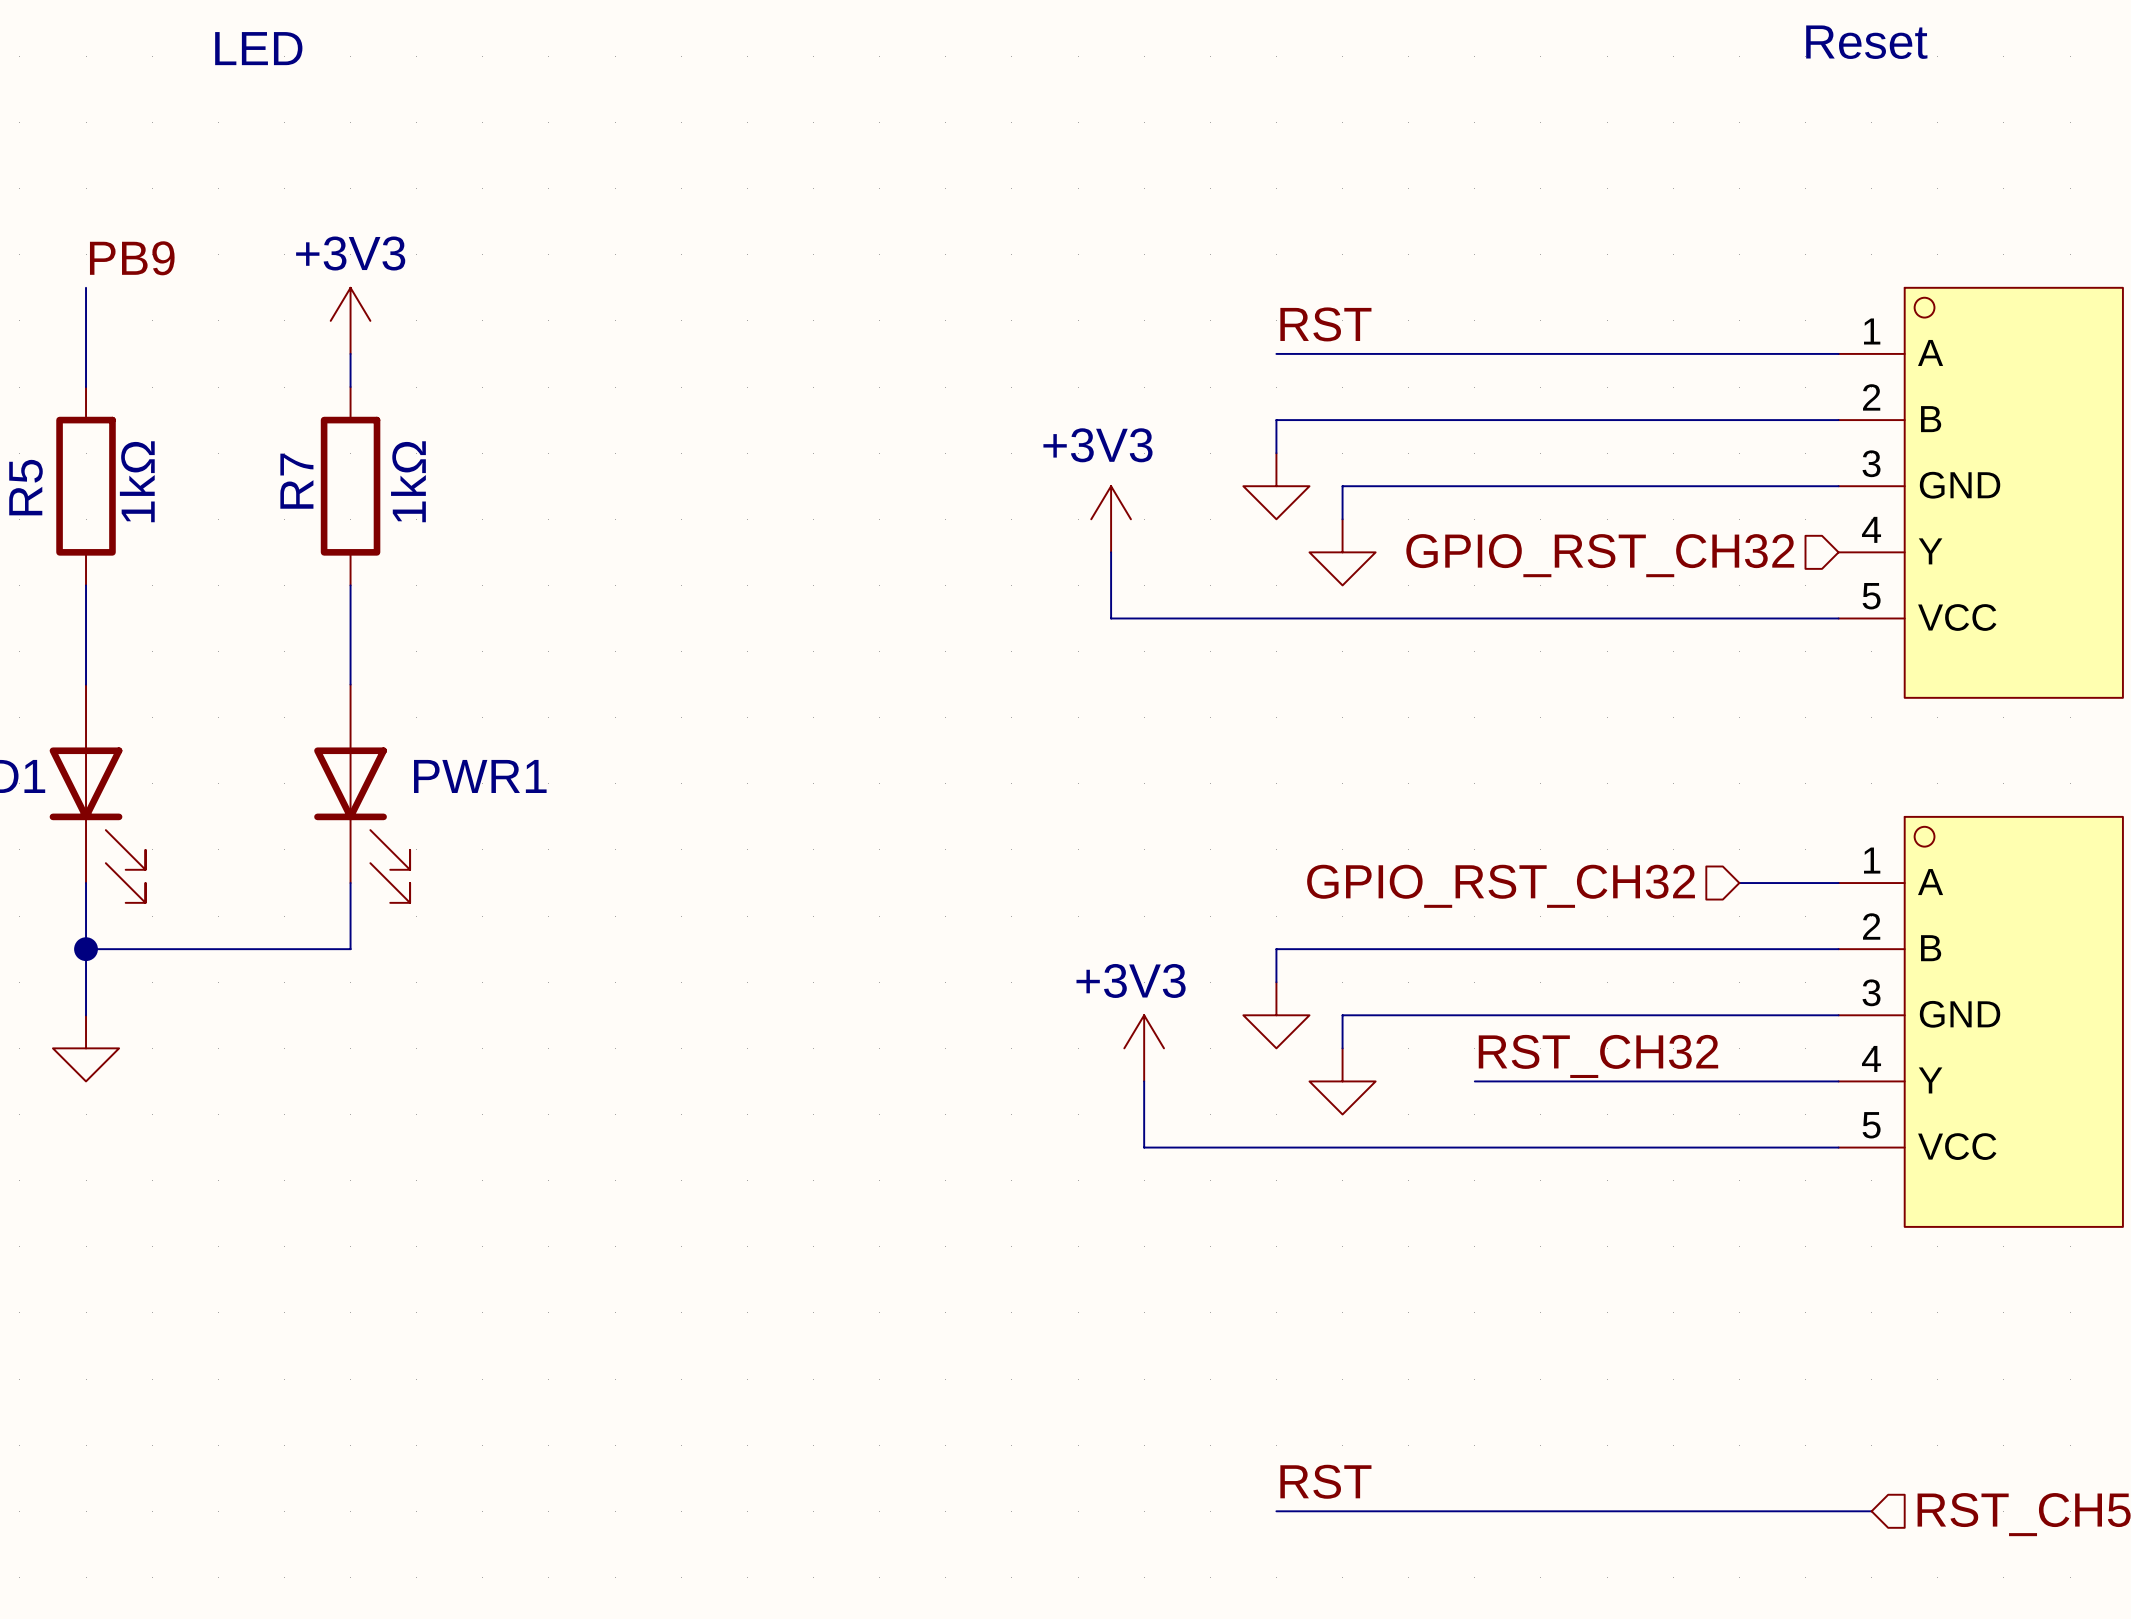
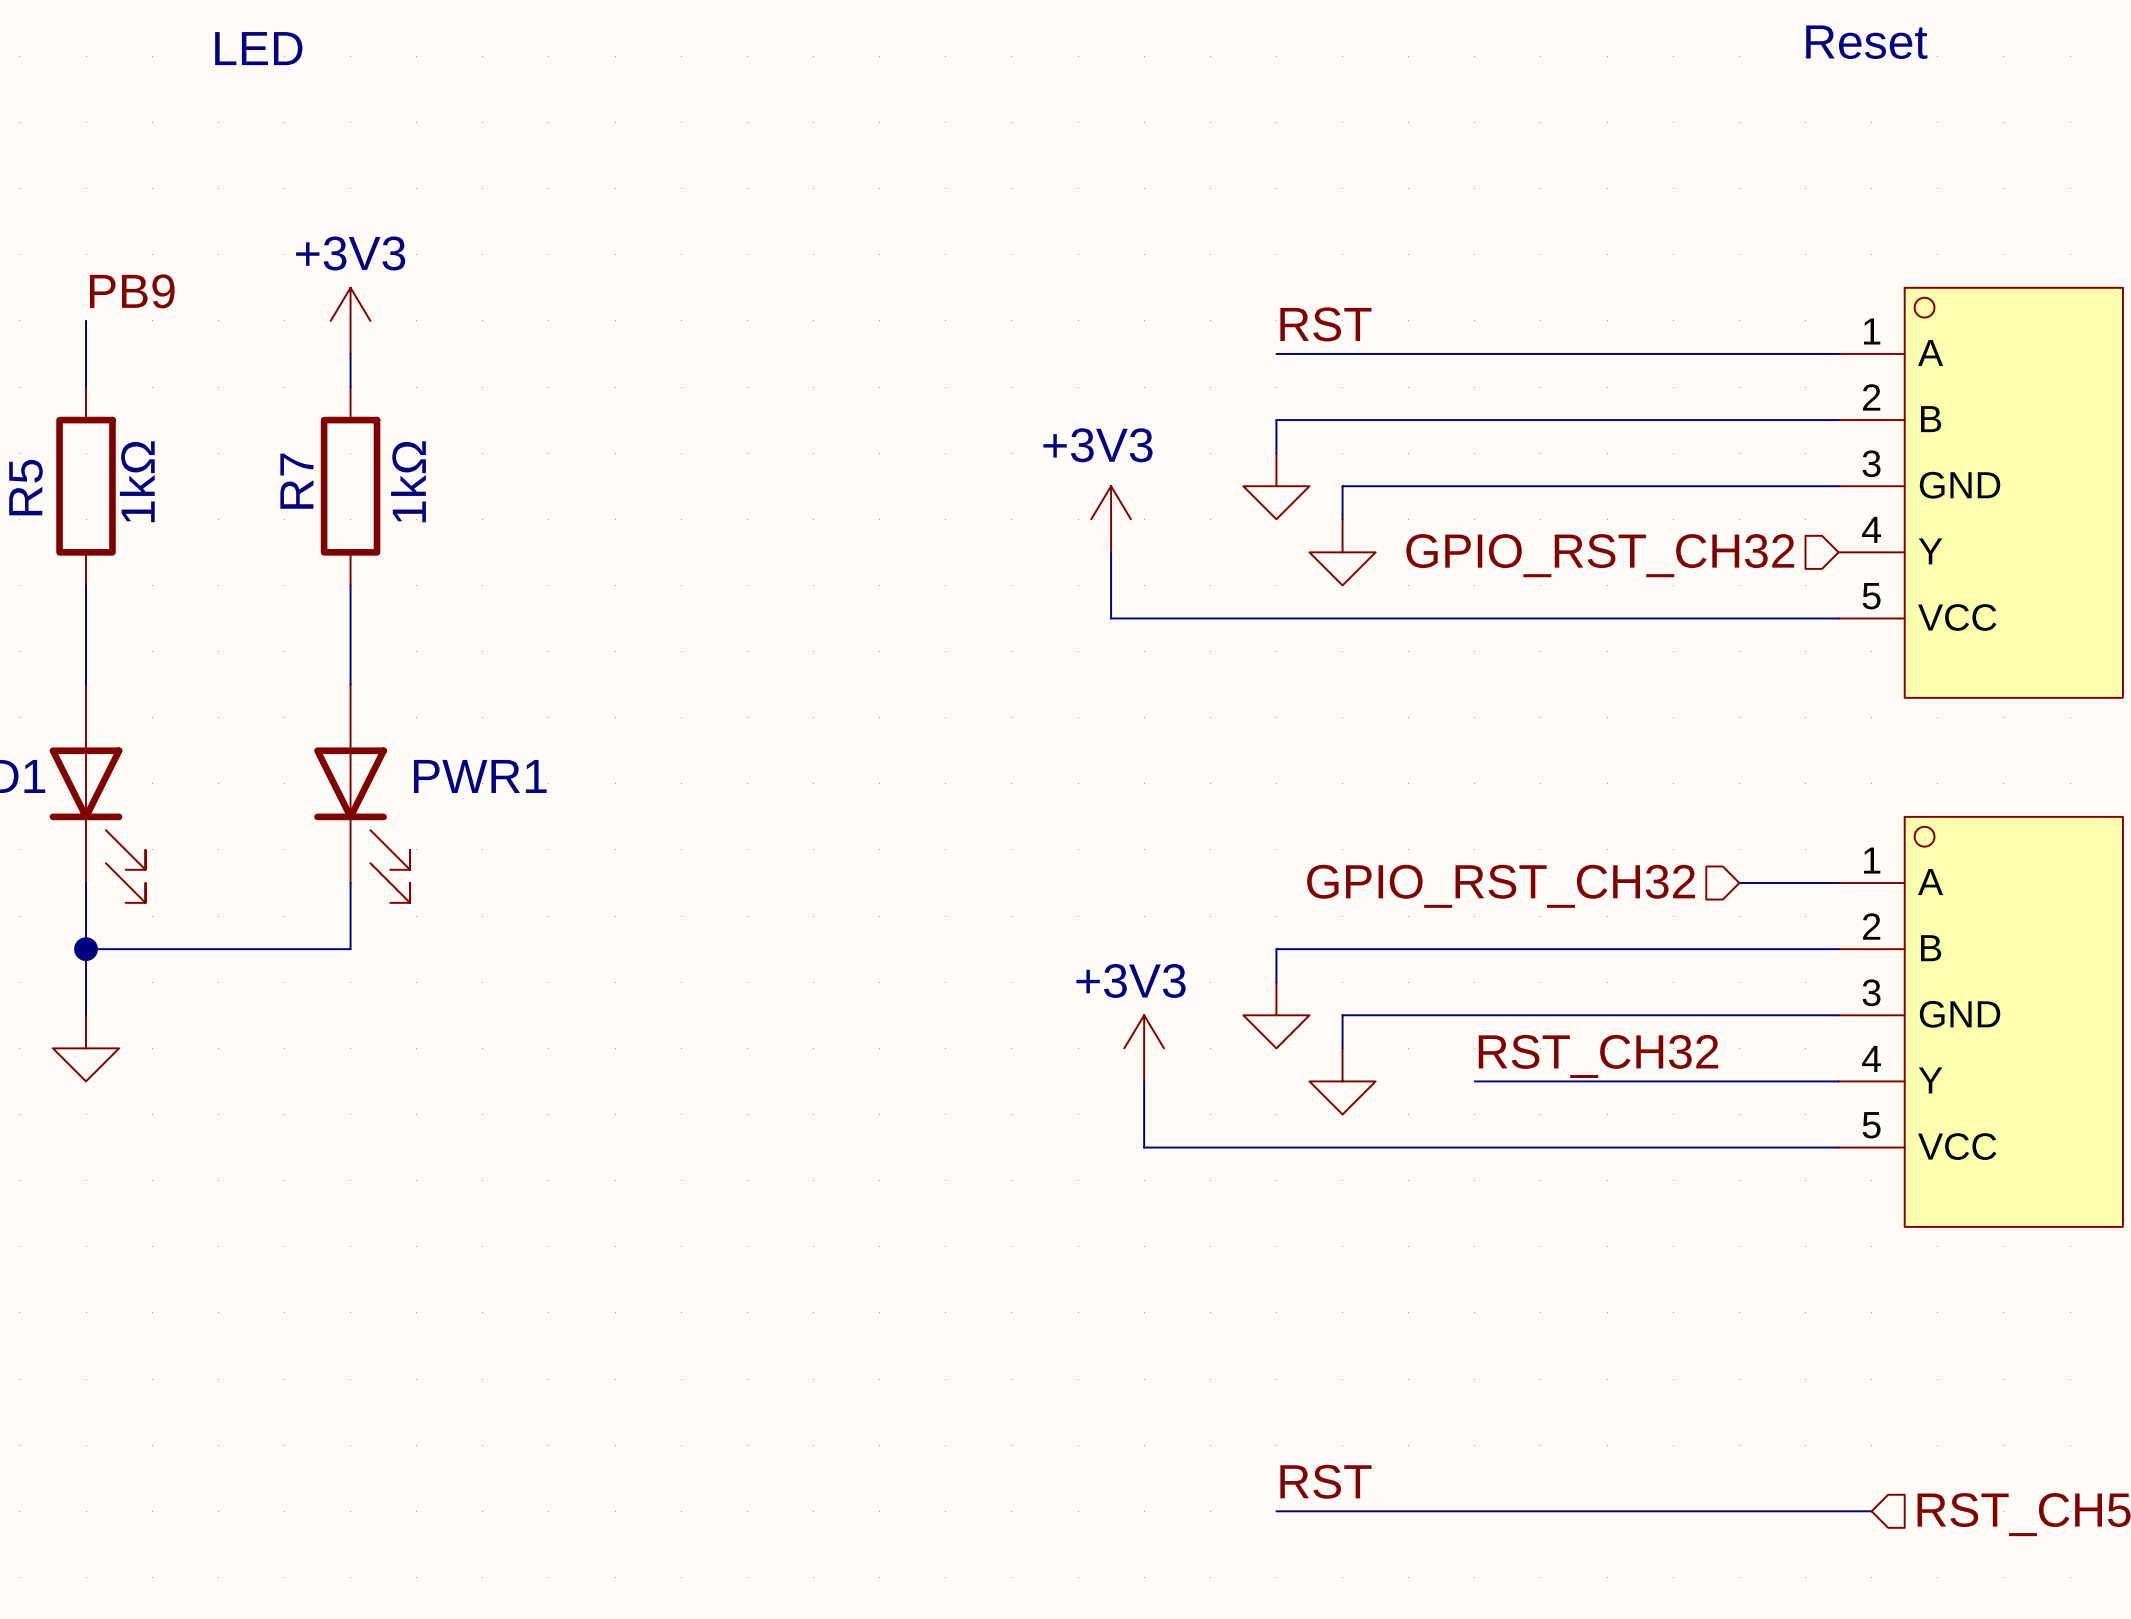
label position: PB9 (132, 258) -> PB9 (132, 291)
wire: (86, 287) (86, 320) -> none

